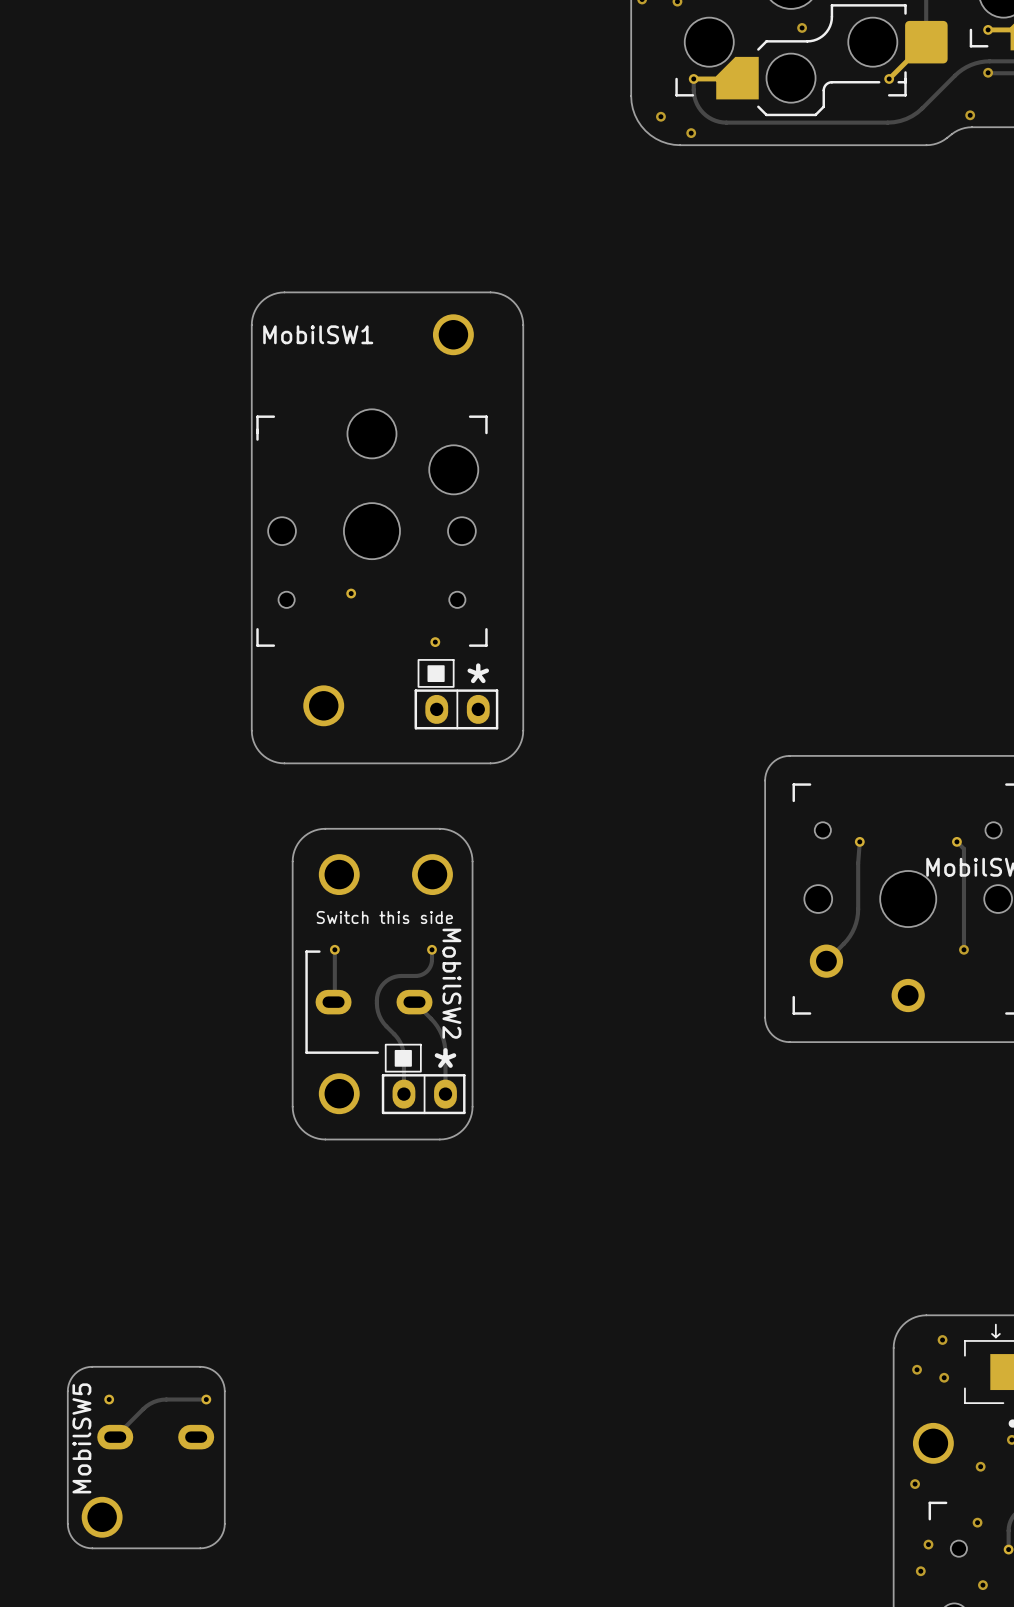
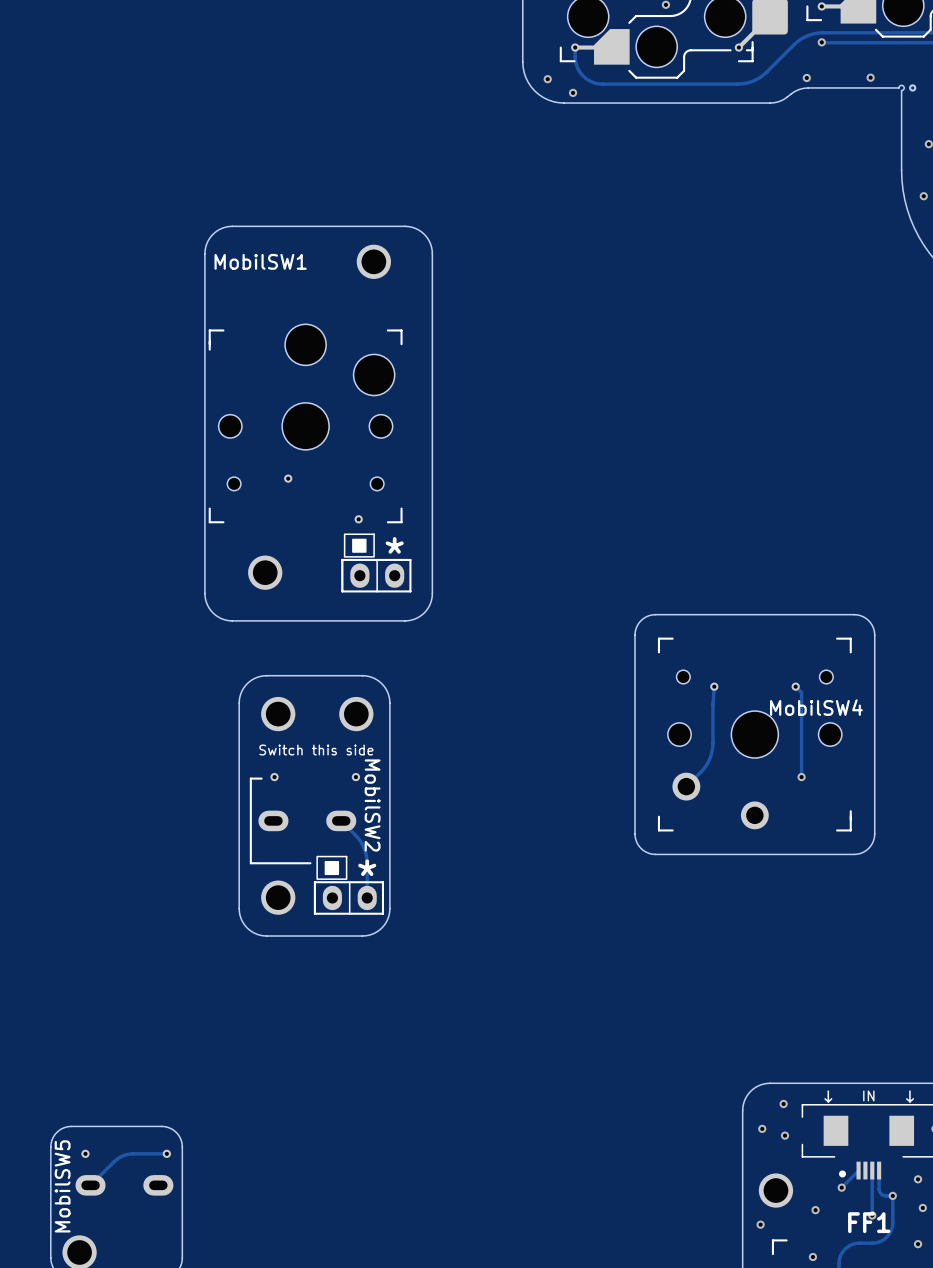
track: (334, 949) (334, 1000) -> none
track: (431, 949) (431, 963) (425, 972) (419, 975) (398, 976) (389, 979) (380, 988) (377, 997) (377, 1007) (381, 1019) (396, 1036) (402, 1047) (403, 1094) -> none

